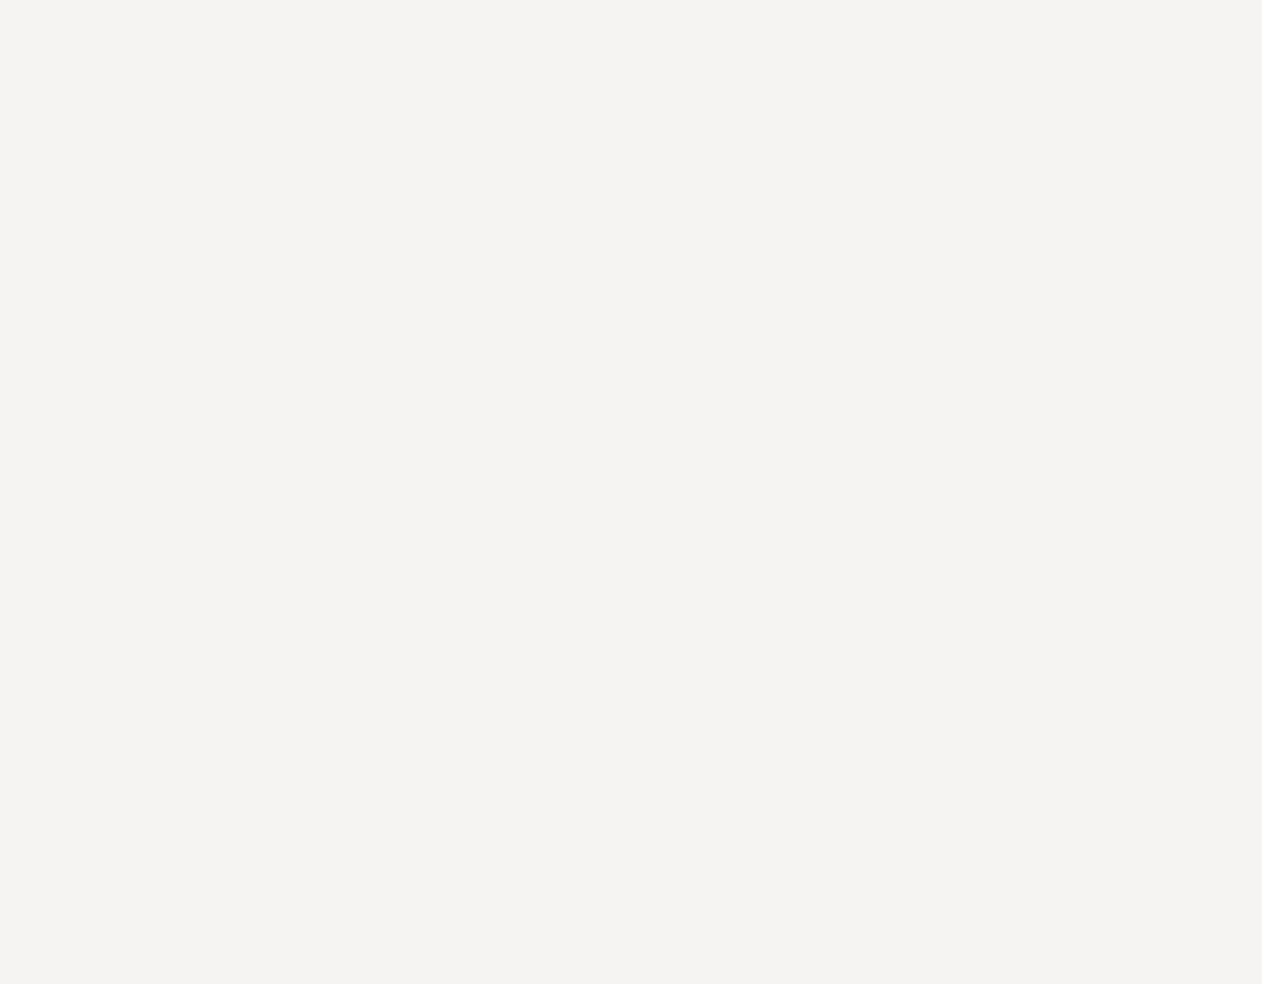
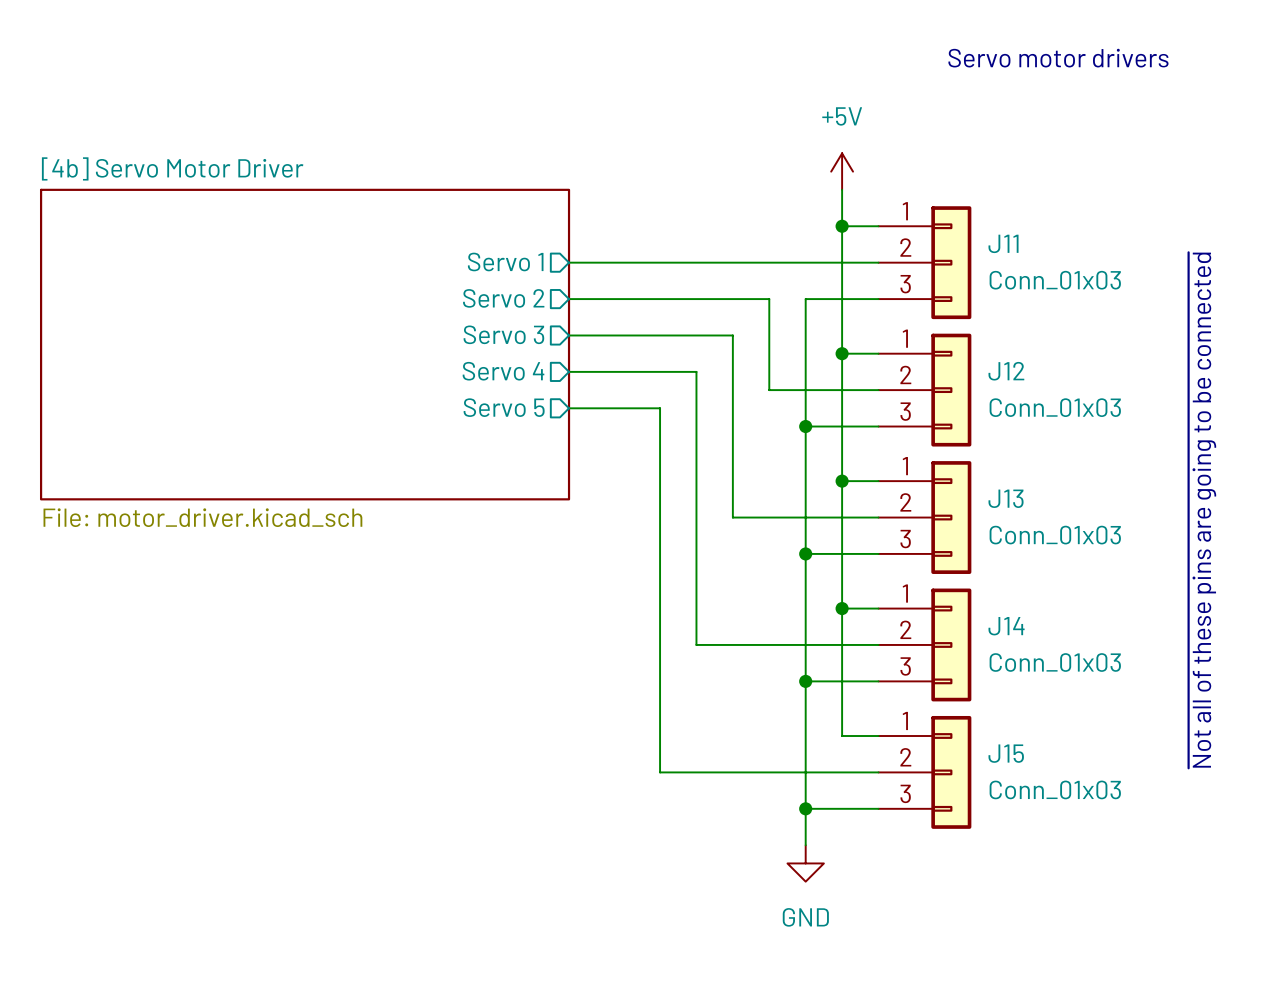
text: none -> Servo motor drivers (1058, 58)
power symbol: none -> +5V (842, 171)
wire: none -> (842, 189) (842, 736) (878, 736)
wire: none -> (842, 226) (878, 226)
junction: none -> (842, 226)
sheet pin: none -> Servo 1 (505, 262)
wire: none -> (569, 262) (878, 262)
J11: none -> Conn_01x03 (924, 262)
sheet pin: none -> Servo 2 (503, 298)
wire: none -> (569, 299) (769, 299) (769, 390) (878, 390)
wire: none -> (878, 299) (805, 299) (805, 845)
sheet pin: none -> Servo 3 (503, 334)
wire: none -> (569, 335) (732, 335) (732, 517) (878, 517)
sheet [4b] Servo Motor Driver: none -> File: motor_driver.kicad_sch (305, 344)
wire: none -> (842, 353) (878, 353)
junction: none -> (842, 353)
sheet pin: none -> Servo 4 (503, 371)
wire: none -> (569, 371) (696, 371) (696, 644) (878, 644)
J12: none -> Conn_01x03 (924, 390)
sheet pin: none -> Servo 5 (504, 407)
wire: none -> (569, 408) (660, 408) (660, 772) (878, 772)
wire: none -> (805, 426) (878, 426)
junction: none -> (805, 426)
wire: none -> (842, 481) (878, 481)
junction: none -> (842, 481)
text: none -> ~{Not all of these pins are going to be connected} (1202, 510)
J13: none -> Conn_01x03 (924, 517)
wire: none -> (805, 553) (878, 553)
junction: none -> (805, 553)
wire: none -> (842, 608) (878, 608)
junction: none -> (842, 608)
J14: none -> Conn_01x03 (924, 644)
wire: none -> (805, 681) (878, 681)
junction: none -> (805, 681)
J15: none -> Conn_01x03 (924, 772)
wire: none -> (805, 808) (878, 808)
junction: none -> (805, 808)
power symbol: none -> GND (805, 863)

